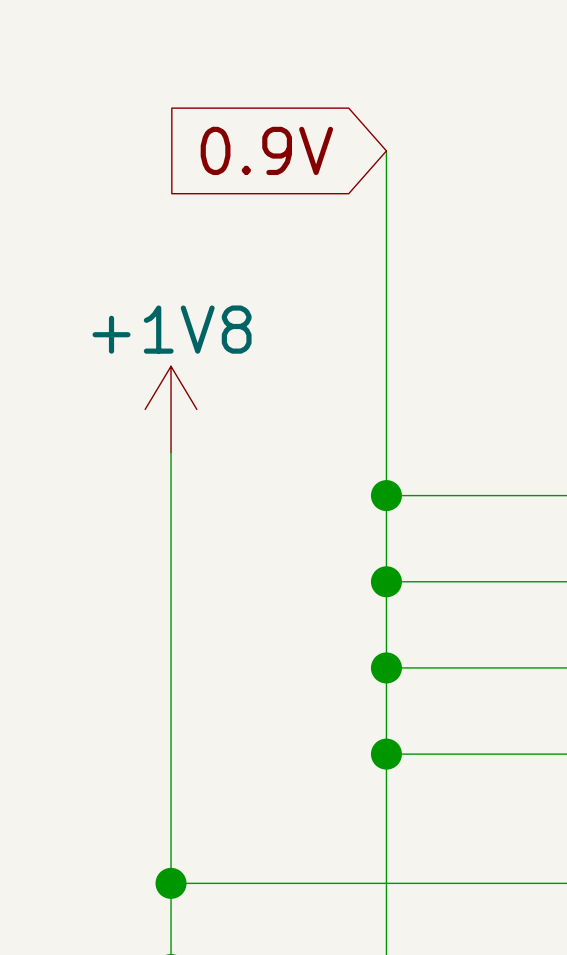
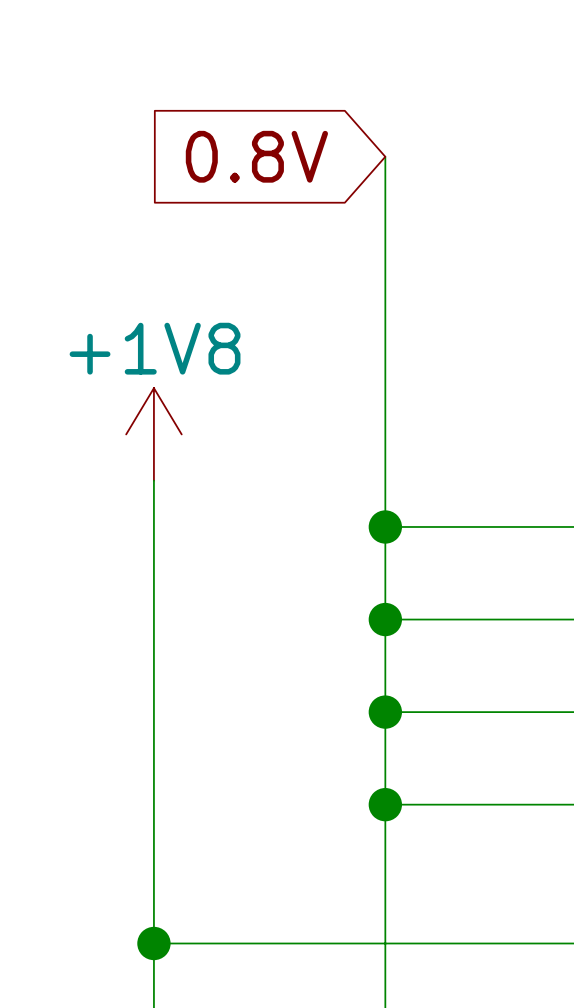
global label: 0.9V (266, 150) -> 0.8V (256, 156)

